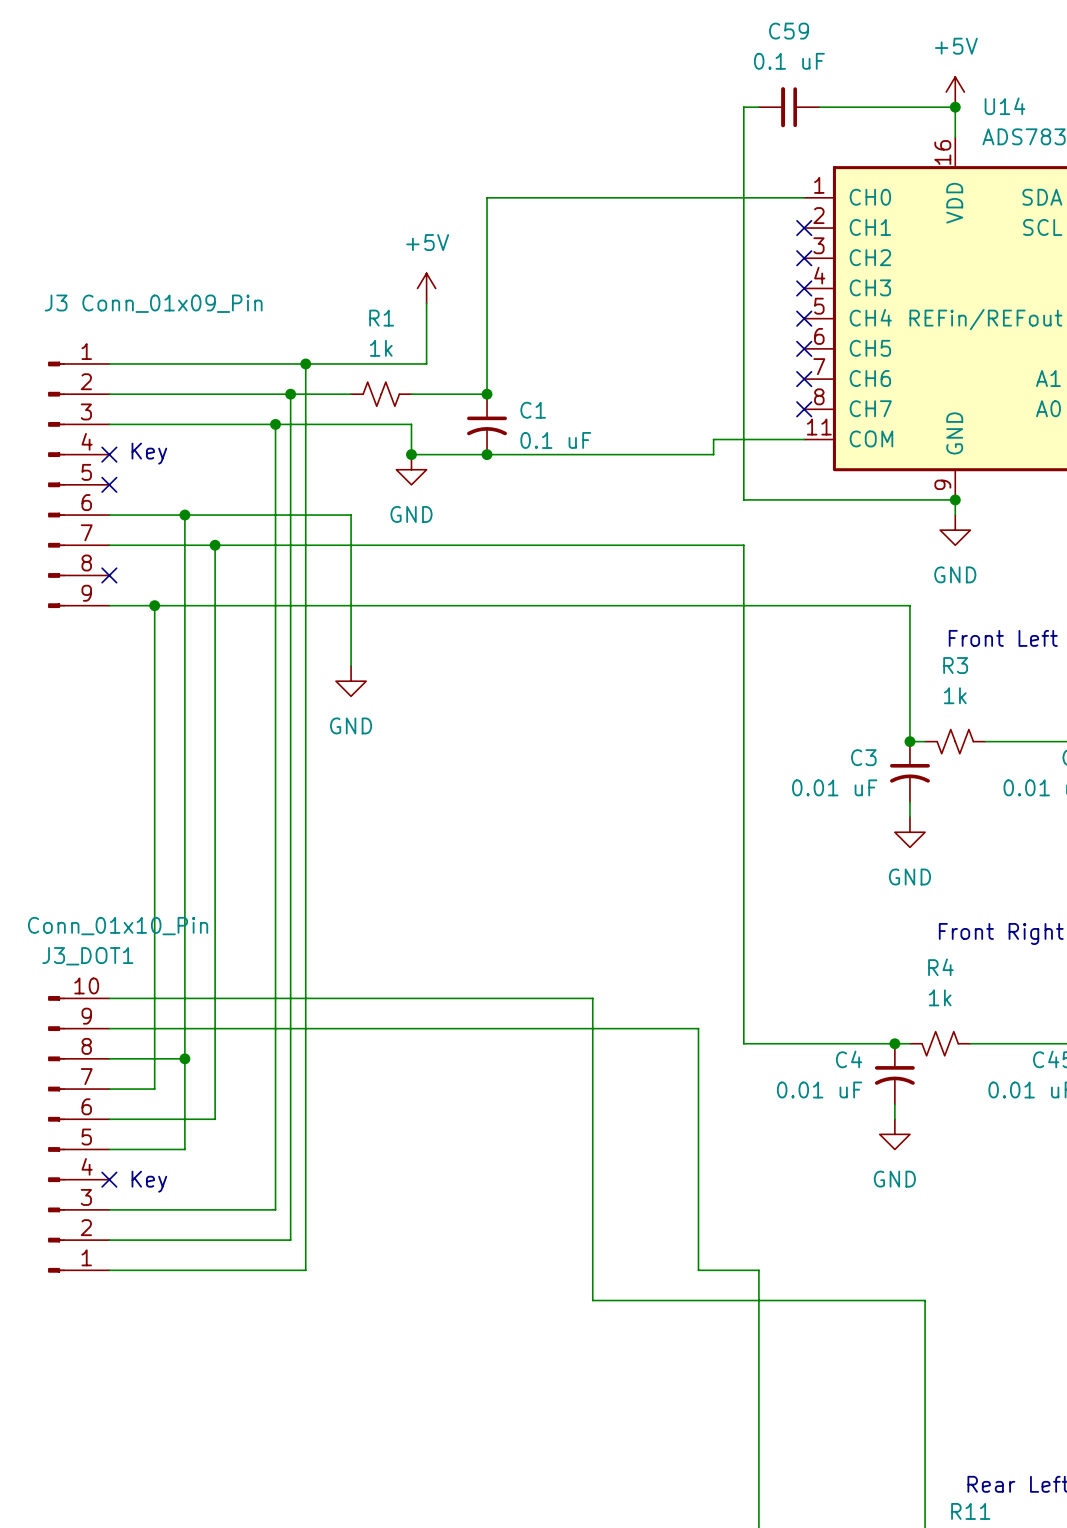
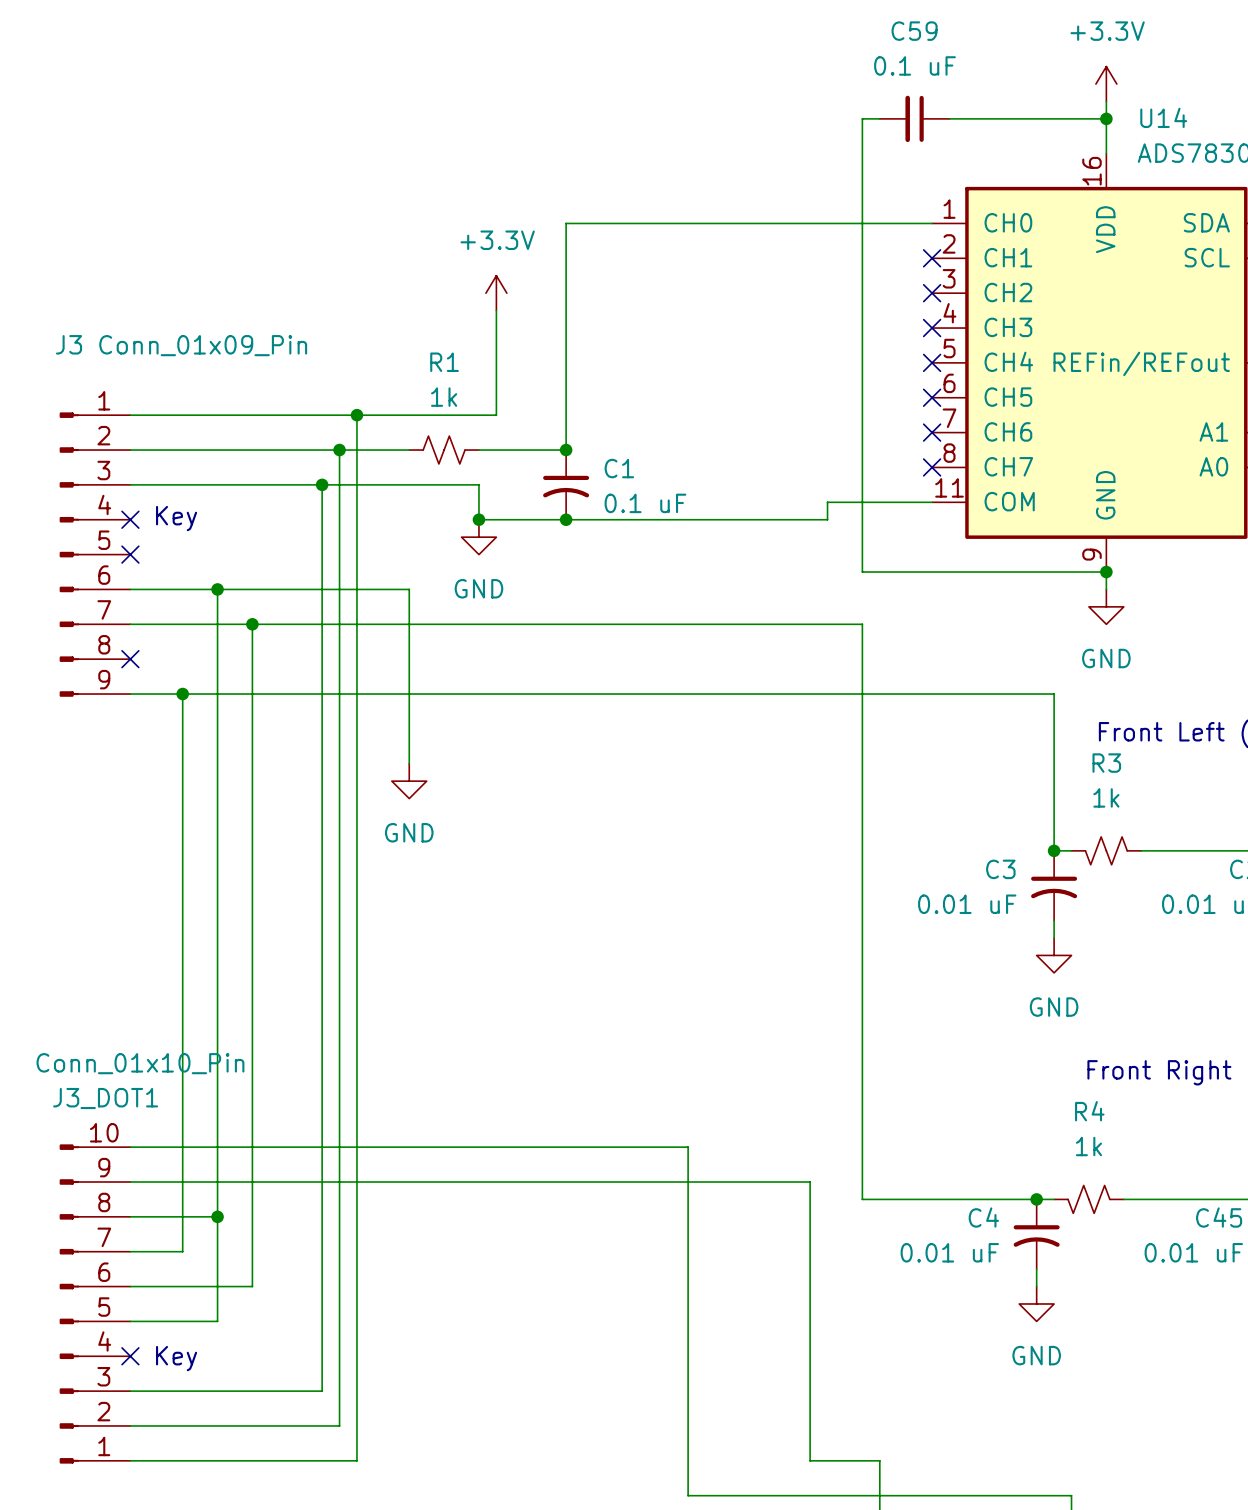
power symbol: none -> +3.3V (1106, 84)
power symbol: +5V (955, 92) -> none
power symbol: none -> +3.3V (496, 293)
power symbol: +5V (426, 288) -> none

